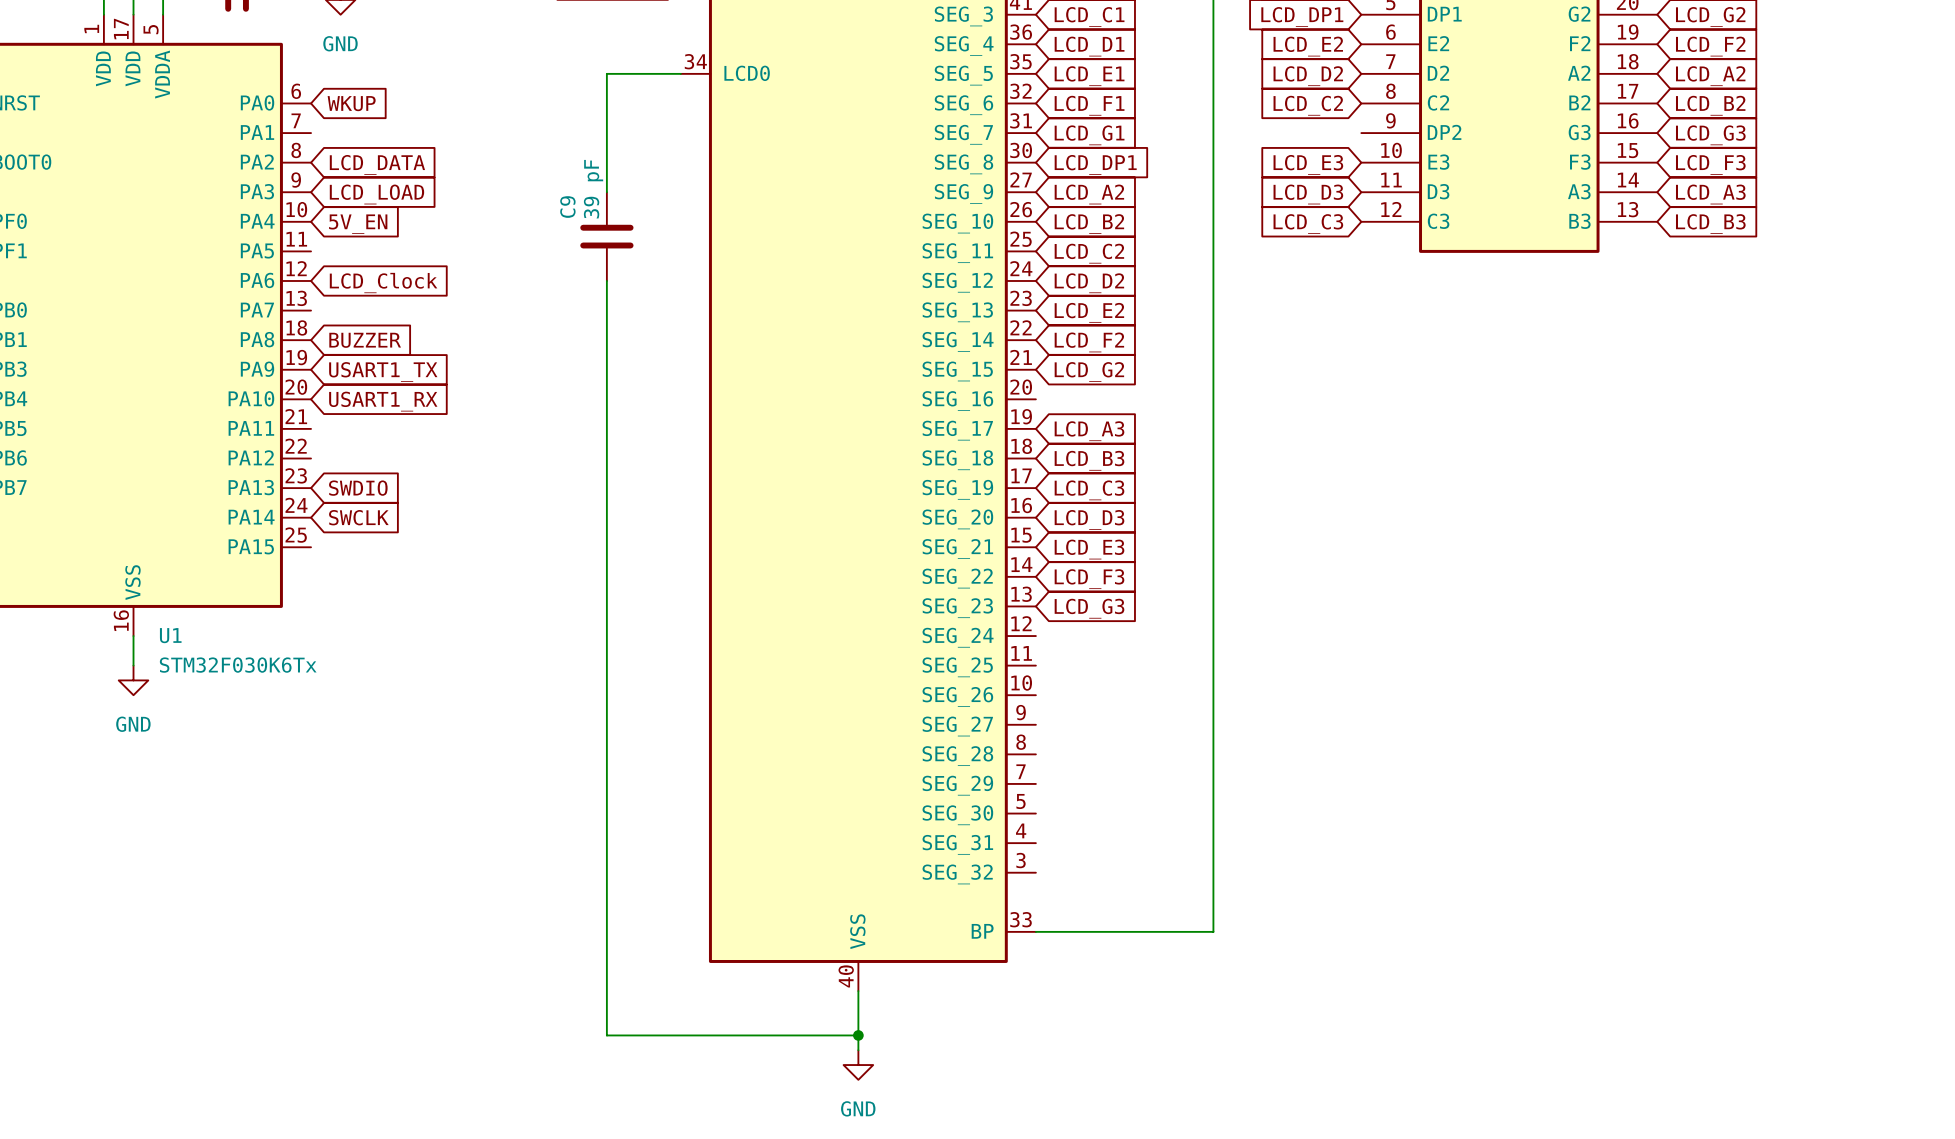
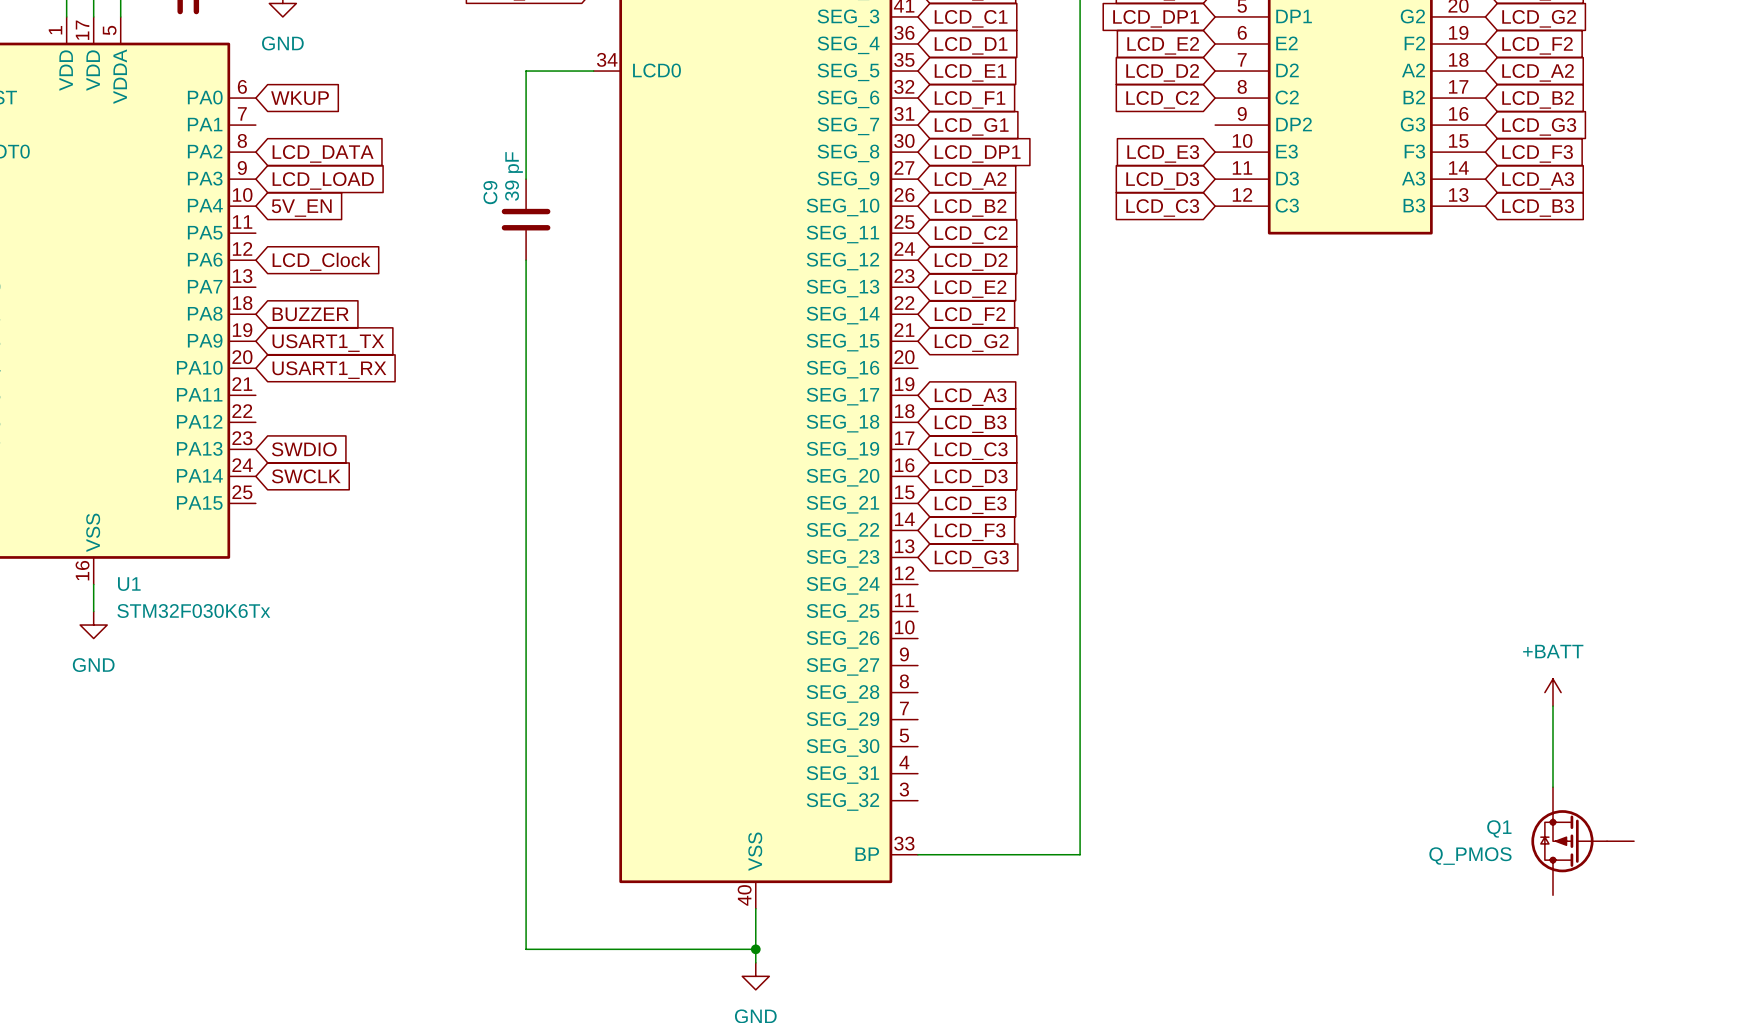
power symbol: none -> +BATT (1553, 692)
wire: none -> (1553, 706) (1553, 787)
Q1: none -> Q_PMOS (1582, 841)

